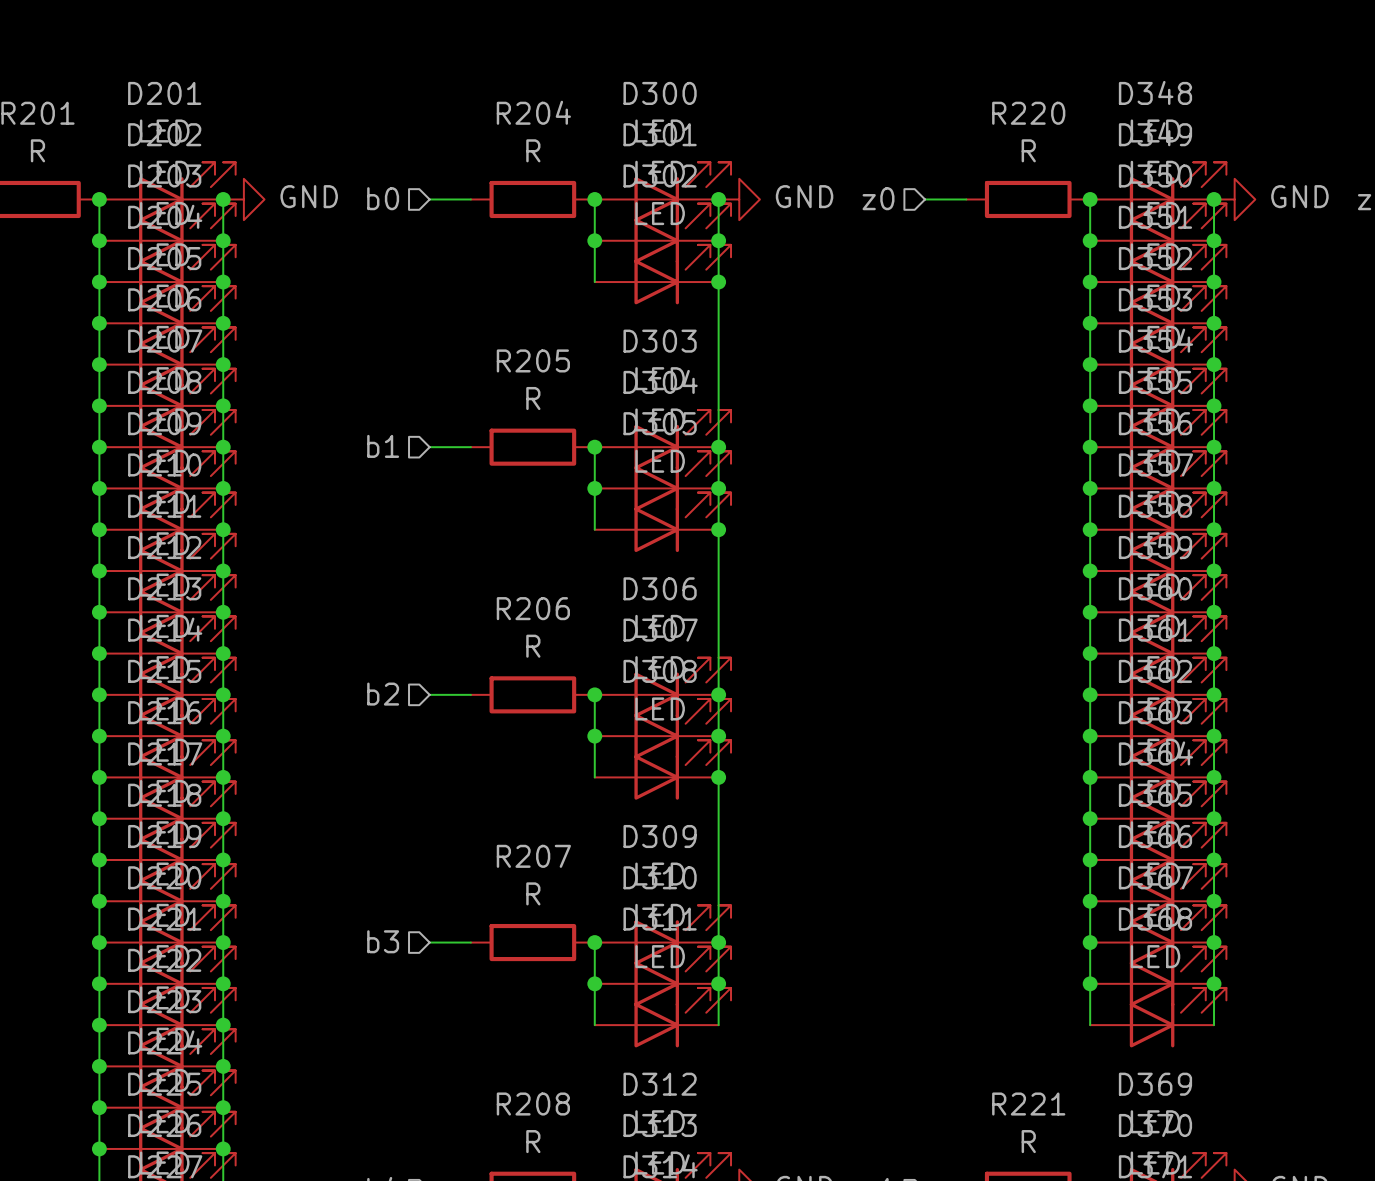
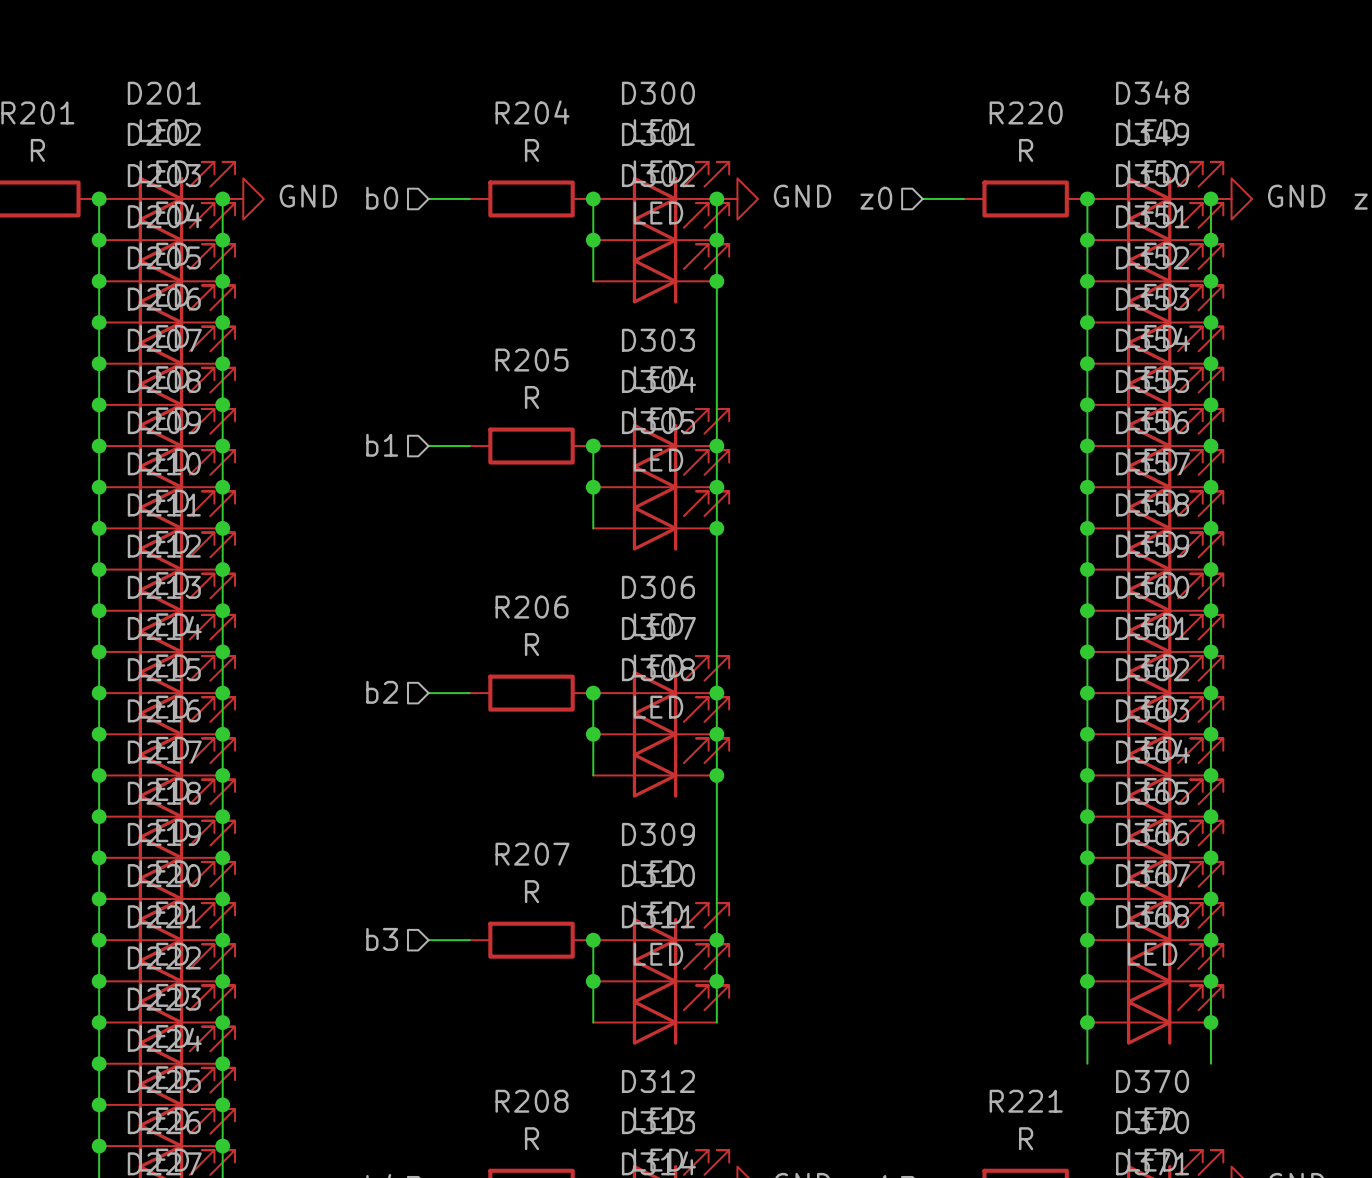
wire: none -> (1087, 1022) (1087, 1063)
junction: none -> (1087, 1022)
wire: none -> (1210, 1022) (1210, 1063)
junction: none -> (1210, 1022)
D369 name: D369 (1155, 1084) -> D370 (1152, 1081)

